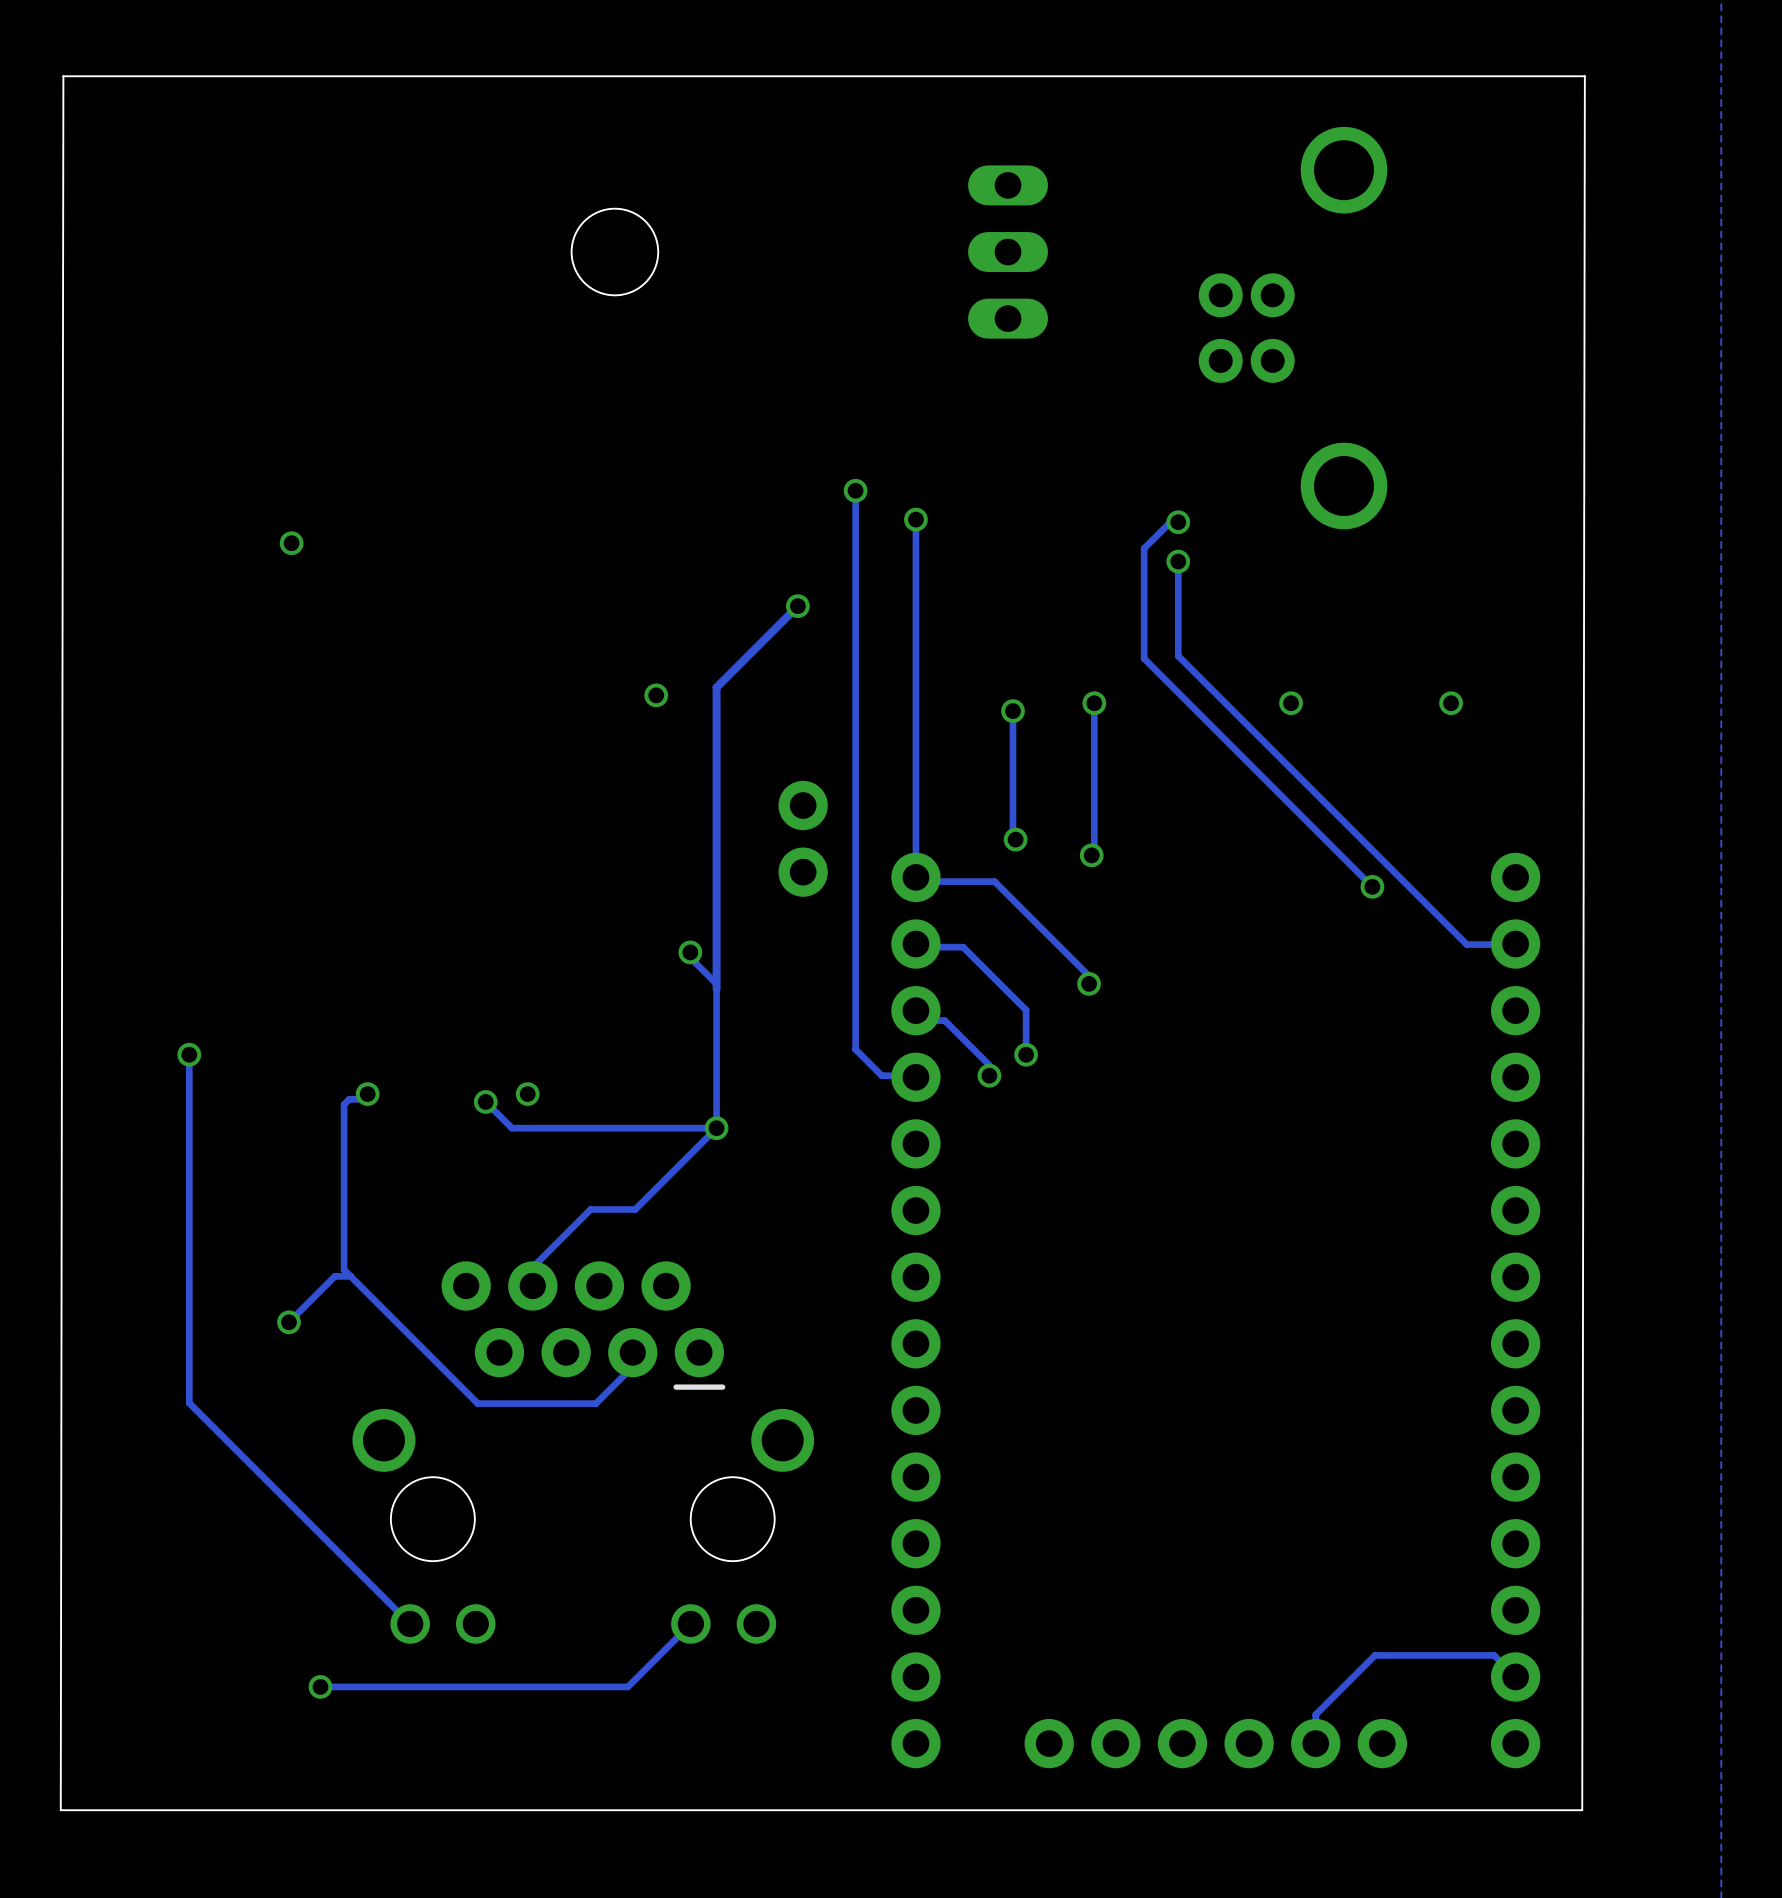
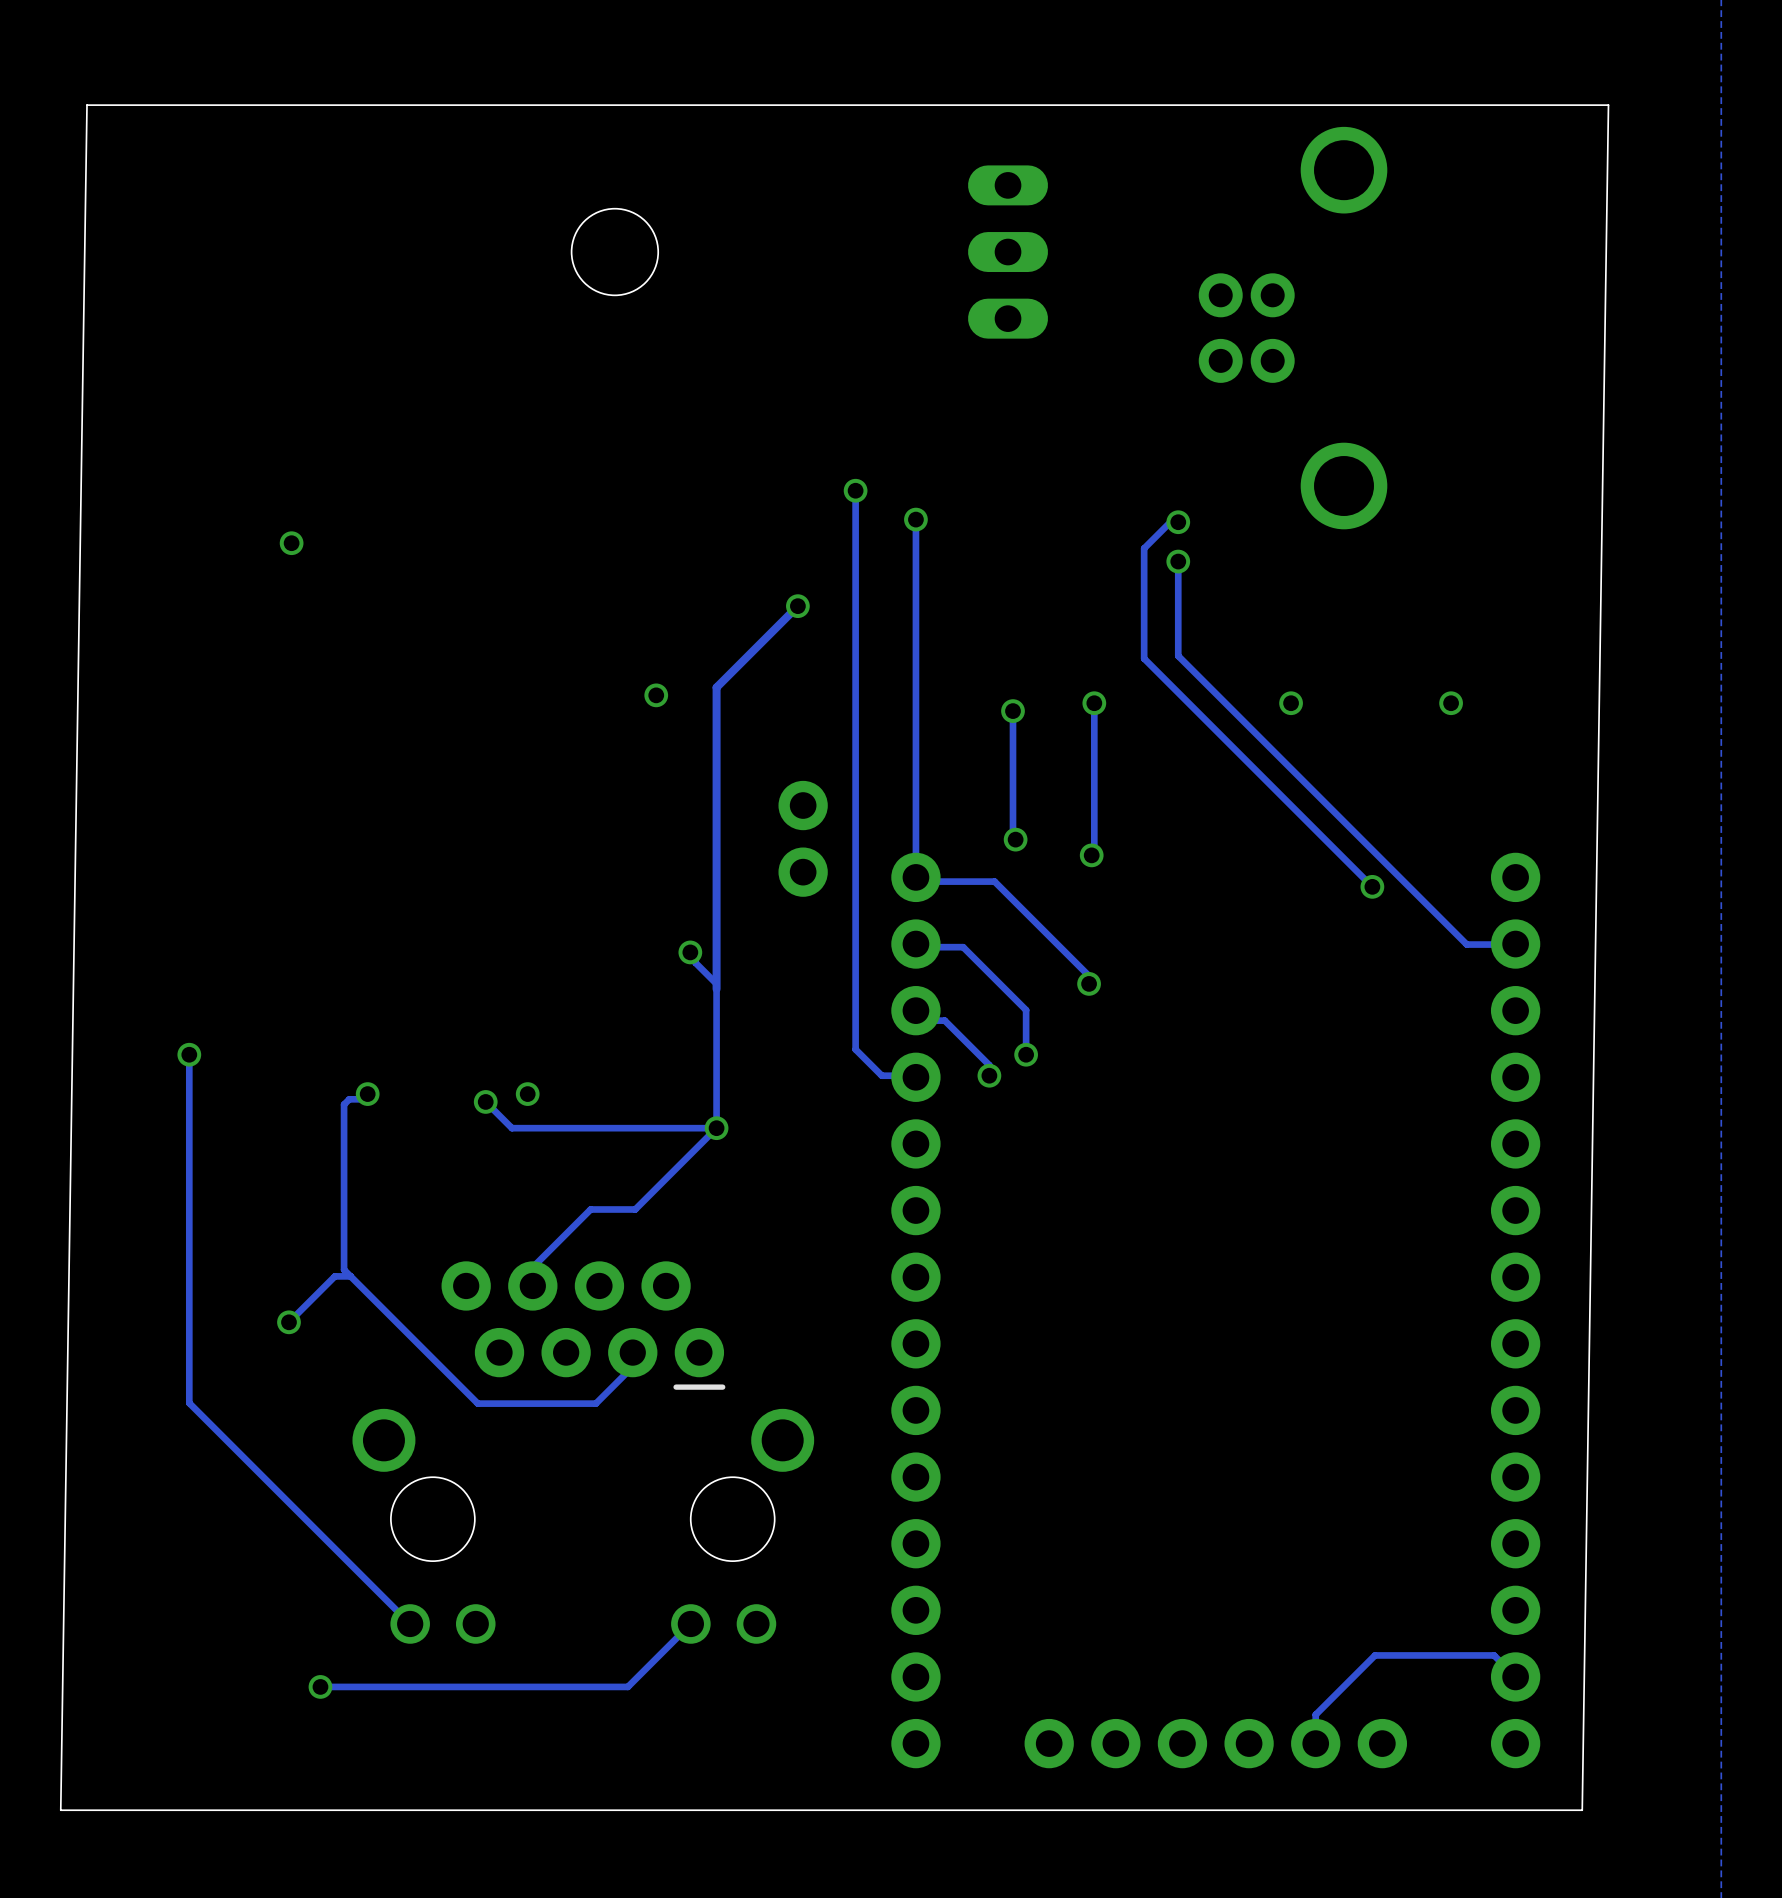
board edge: (1582, 1810) (1584, 76) (63, 76) (60, 1810) -> (1582, 1810) (1608, 105) (87, 105) (60, 1810)

